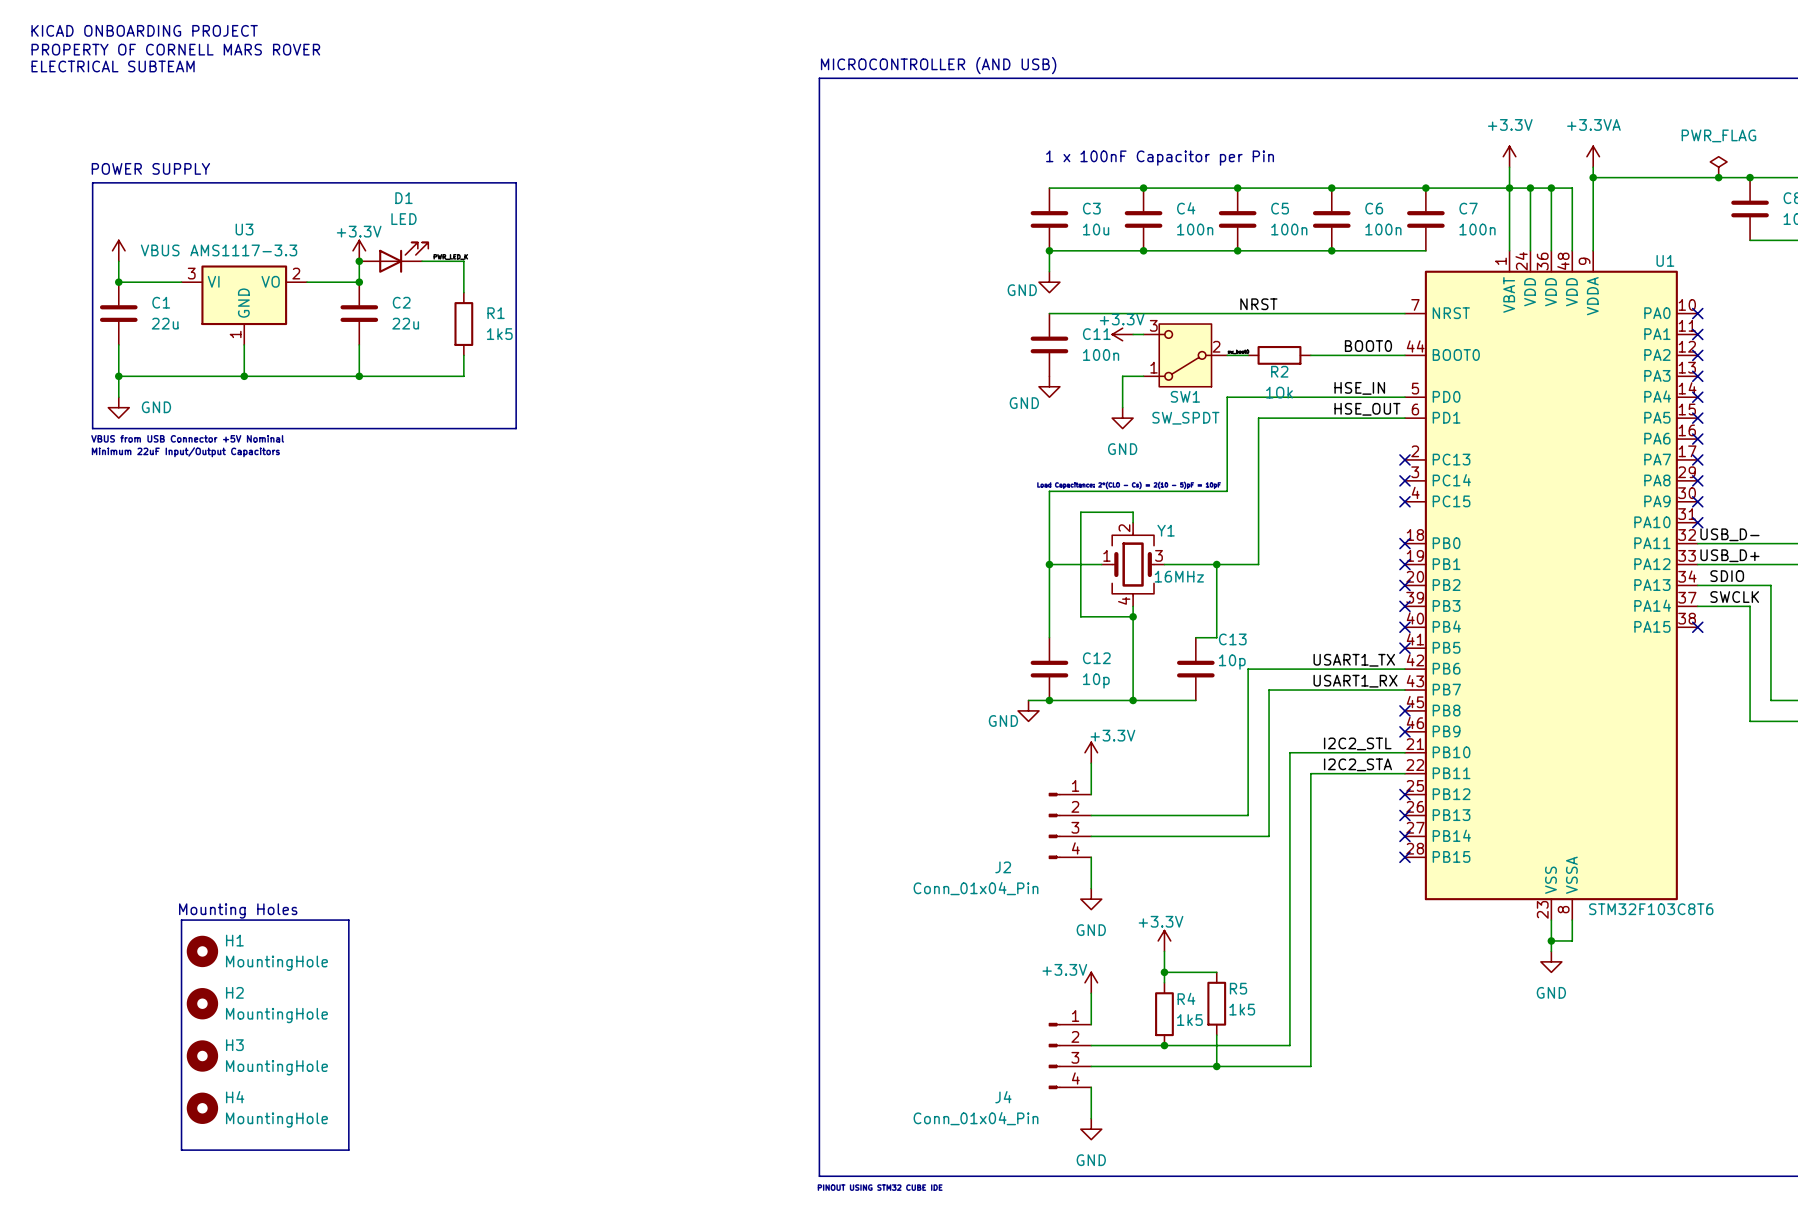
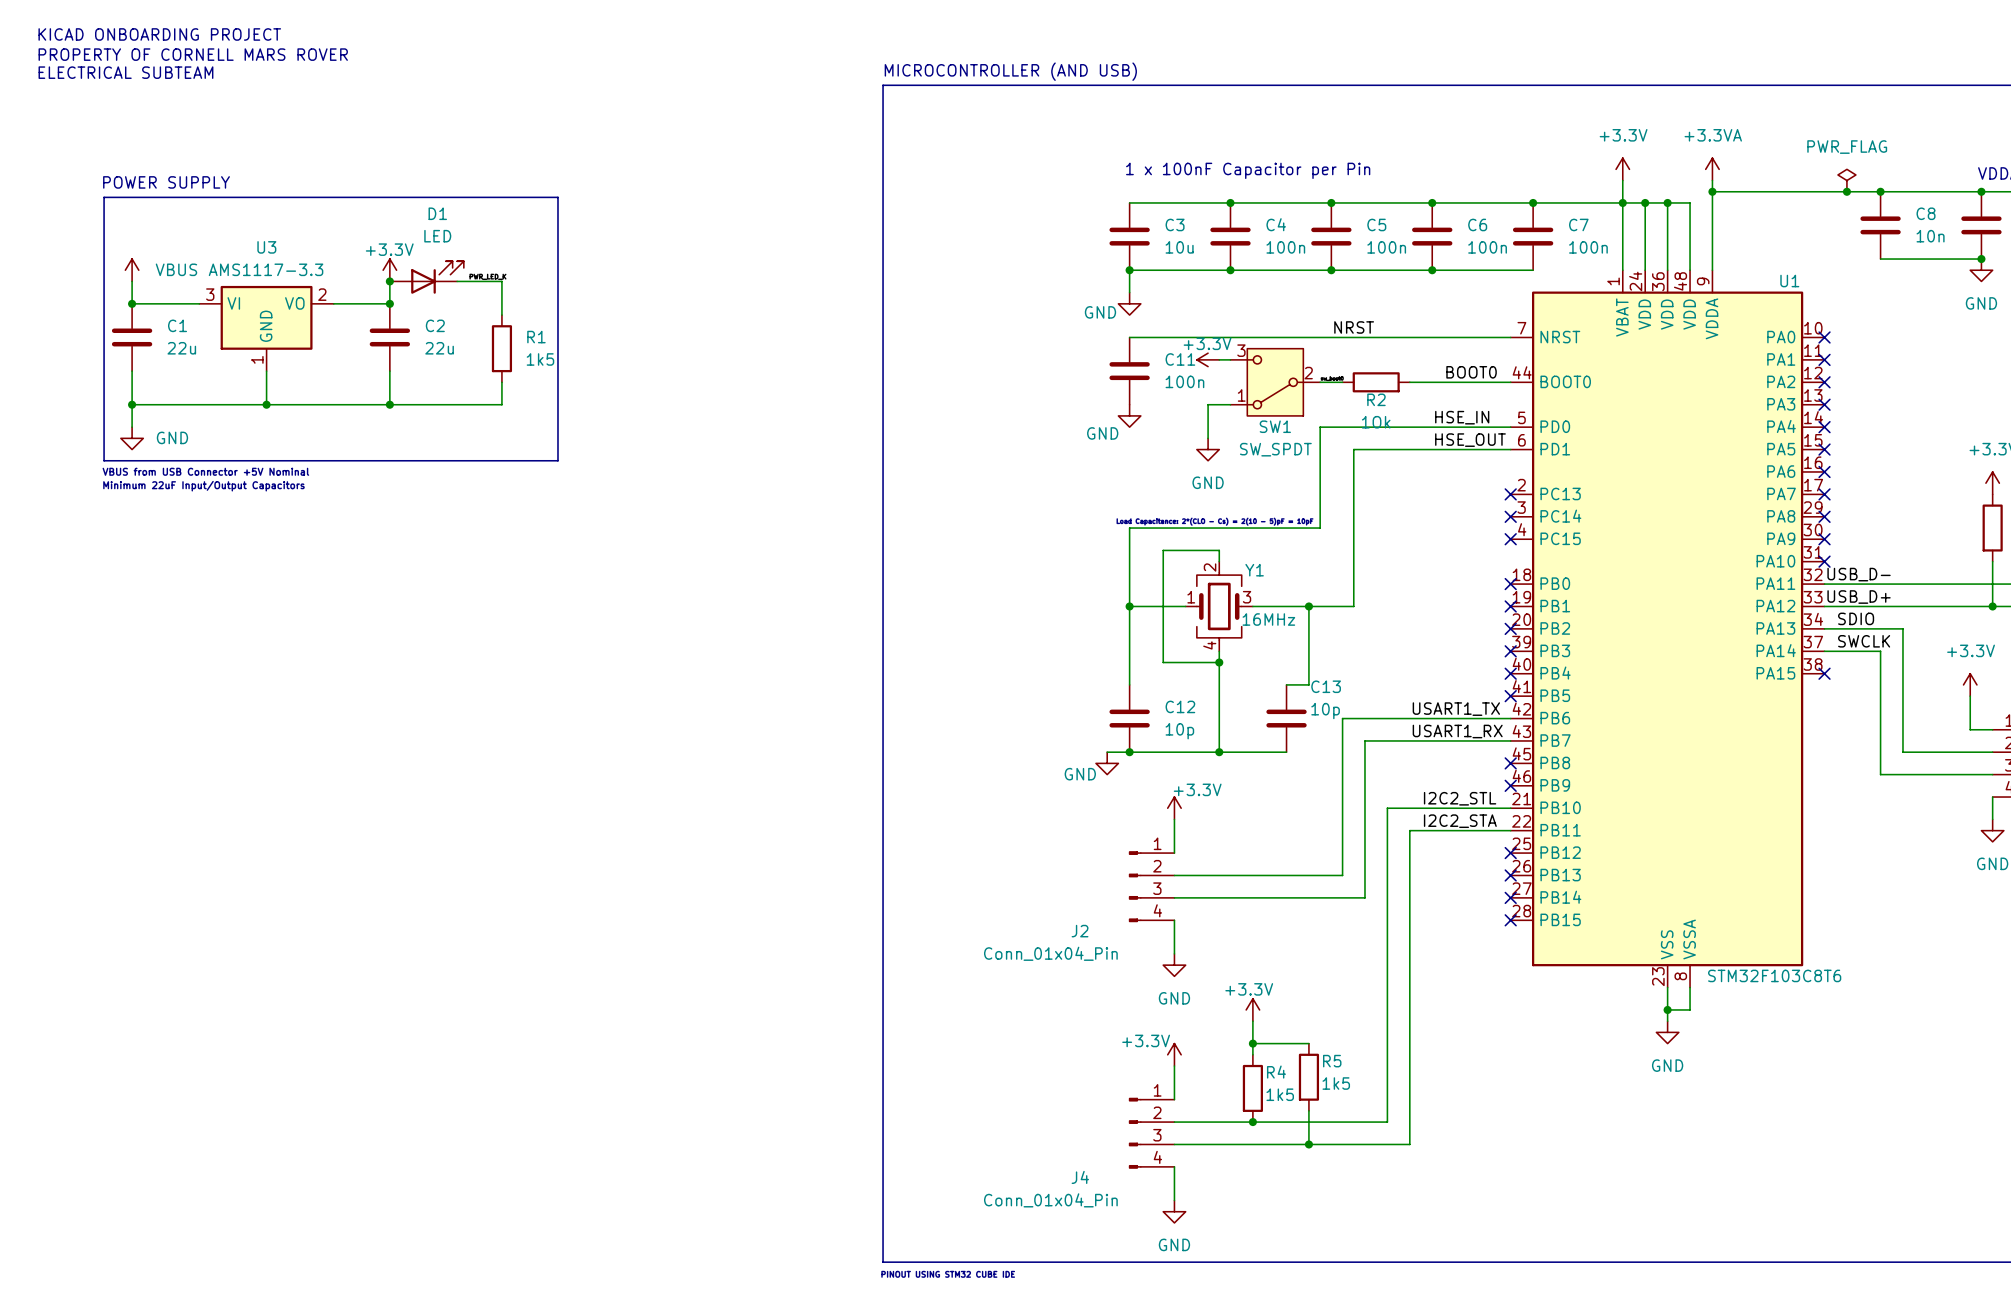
text: Mounting Holes (238, 910) -> none
line: (181, 920) (348, 920) (348, 1150) (181, 1150) (181, 920) -> none
H1: MountingHole (202, 951) -> none
H2: MountingHole (202, 1003) -> none
H3: MountingHole (202, 1056) -> none
H4: MountingHole (202, 1108) -> none

